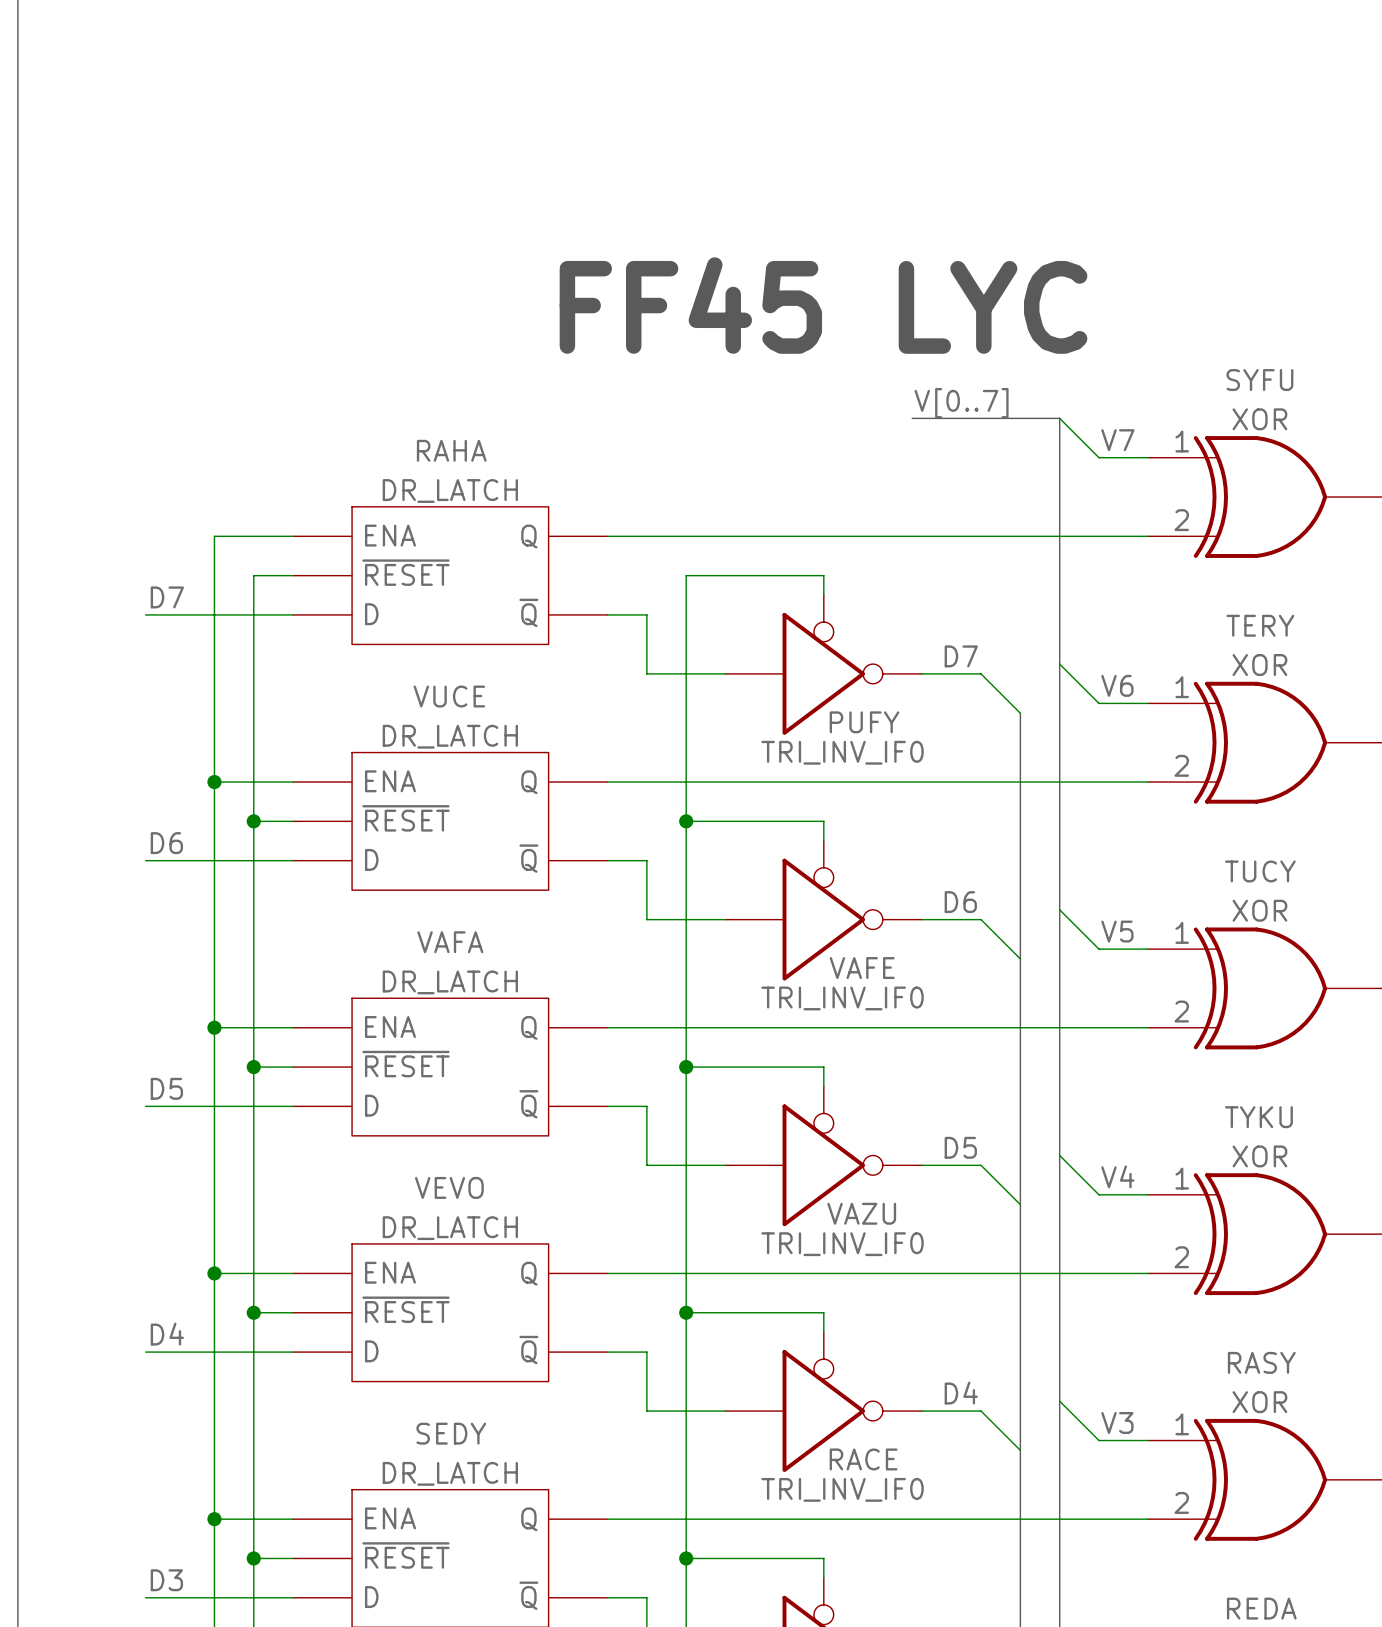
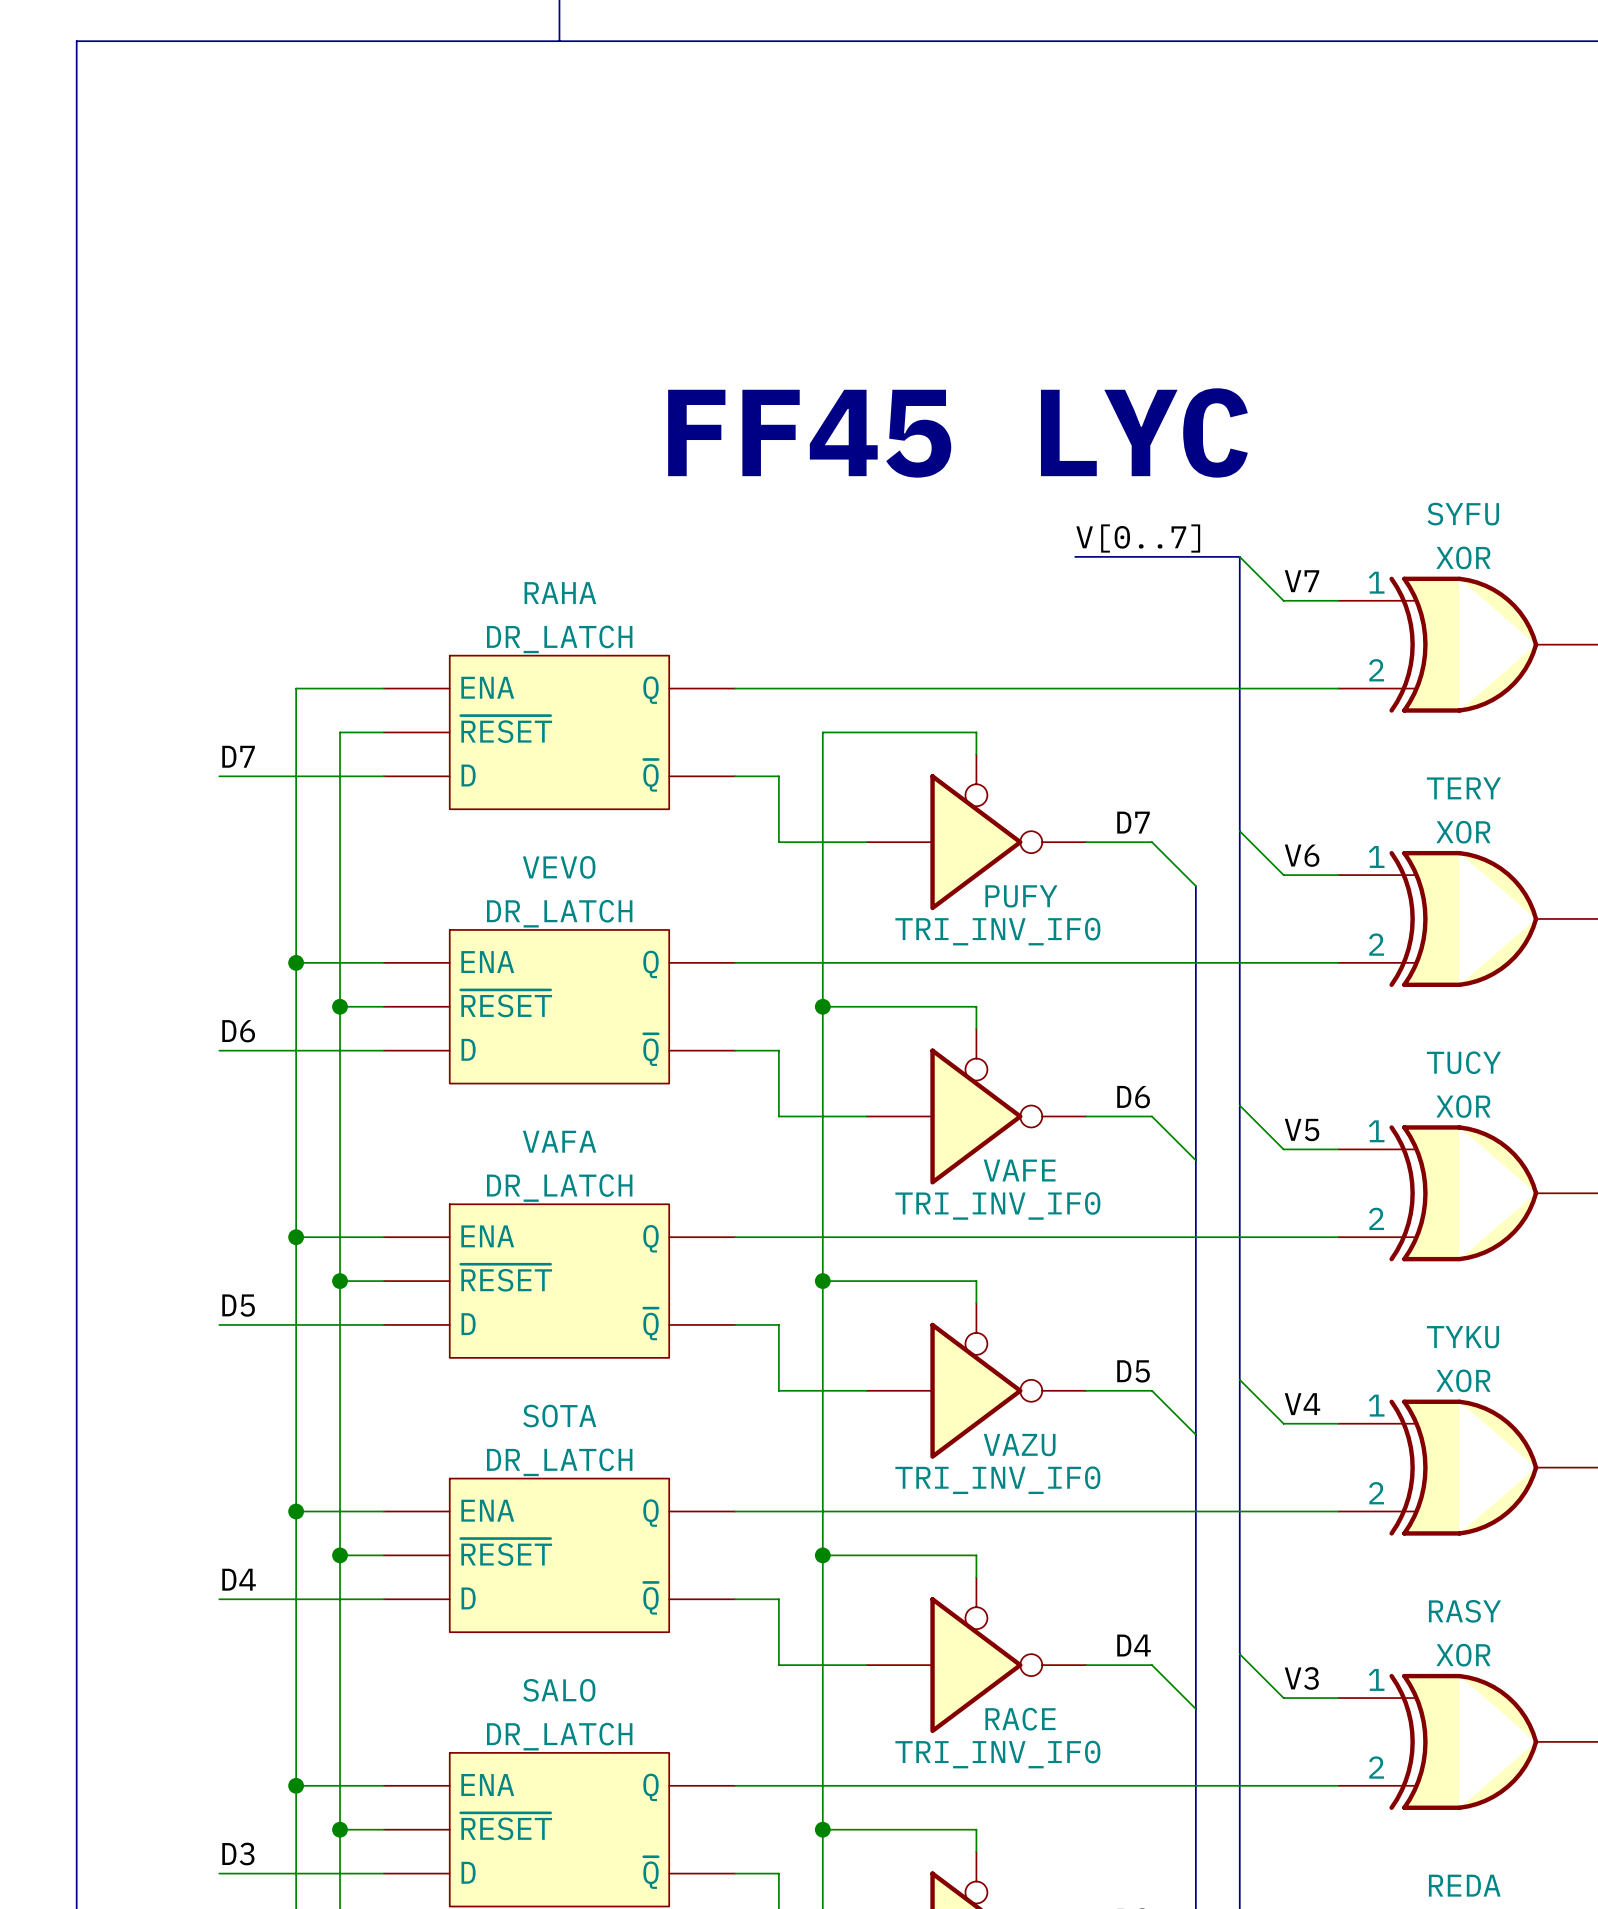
VUCE name: VUCE (449, 696) -> VEVO (559, 867)
VEVO name: VEVO (449, 1187) -> SOTA (559, 1416)
SEDY name: SEDY (451, 1433) -> SALO (559, 1690)

